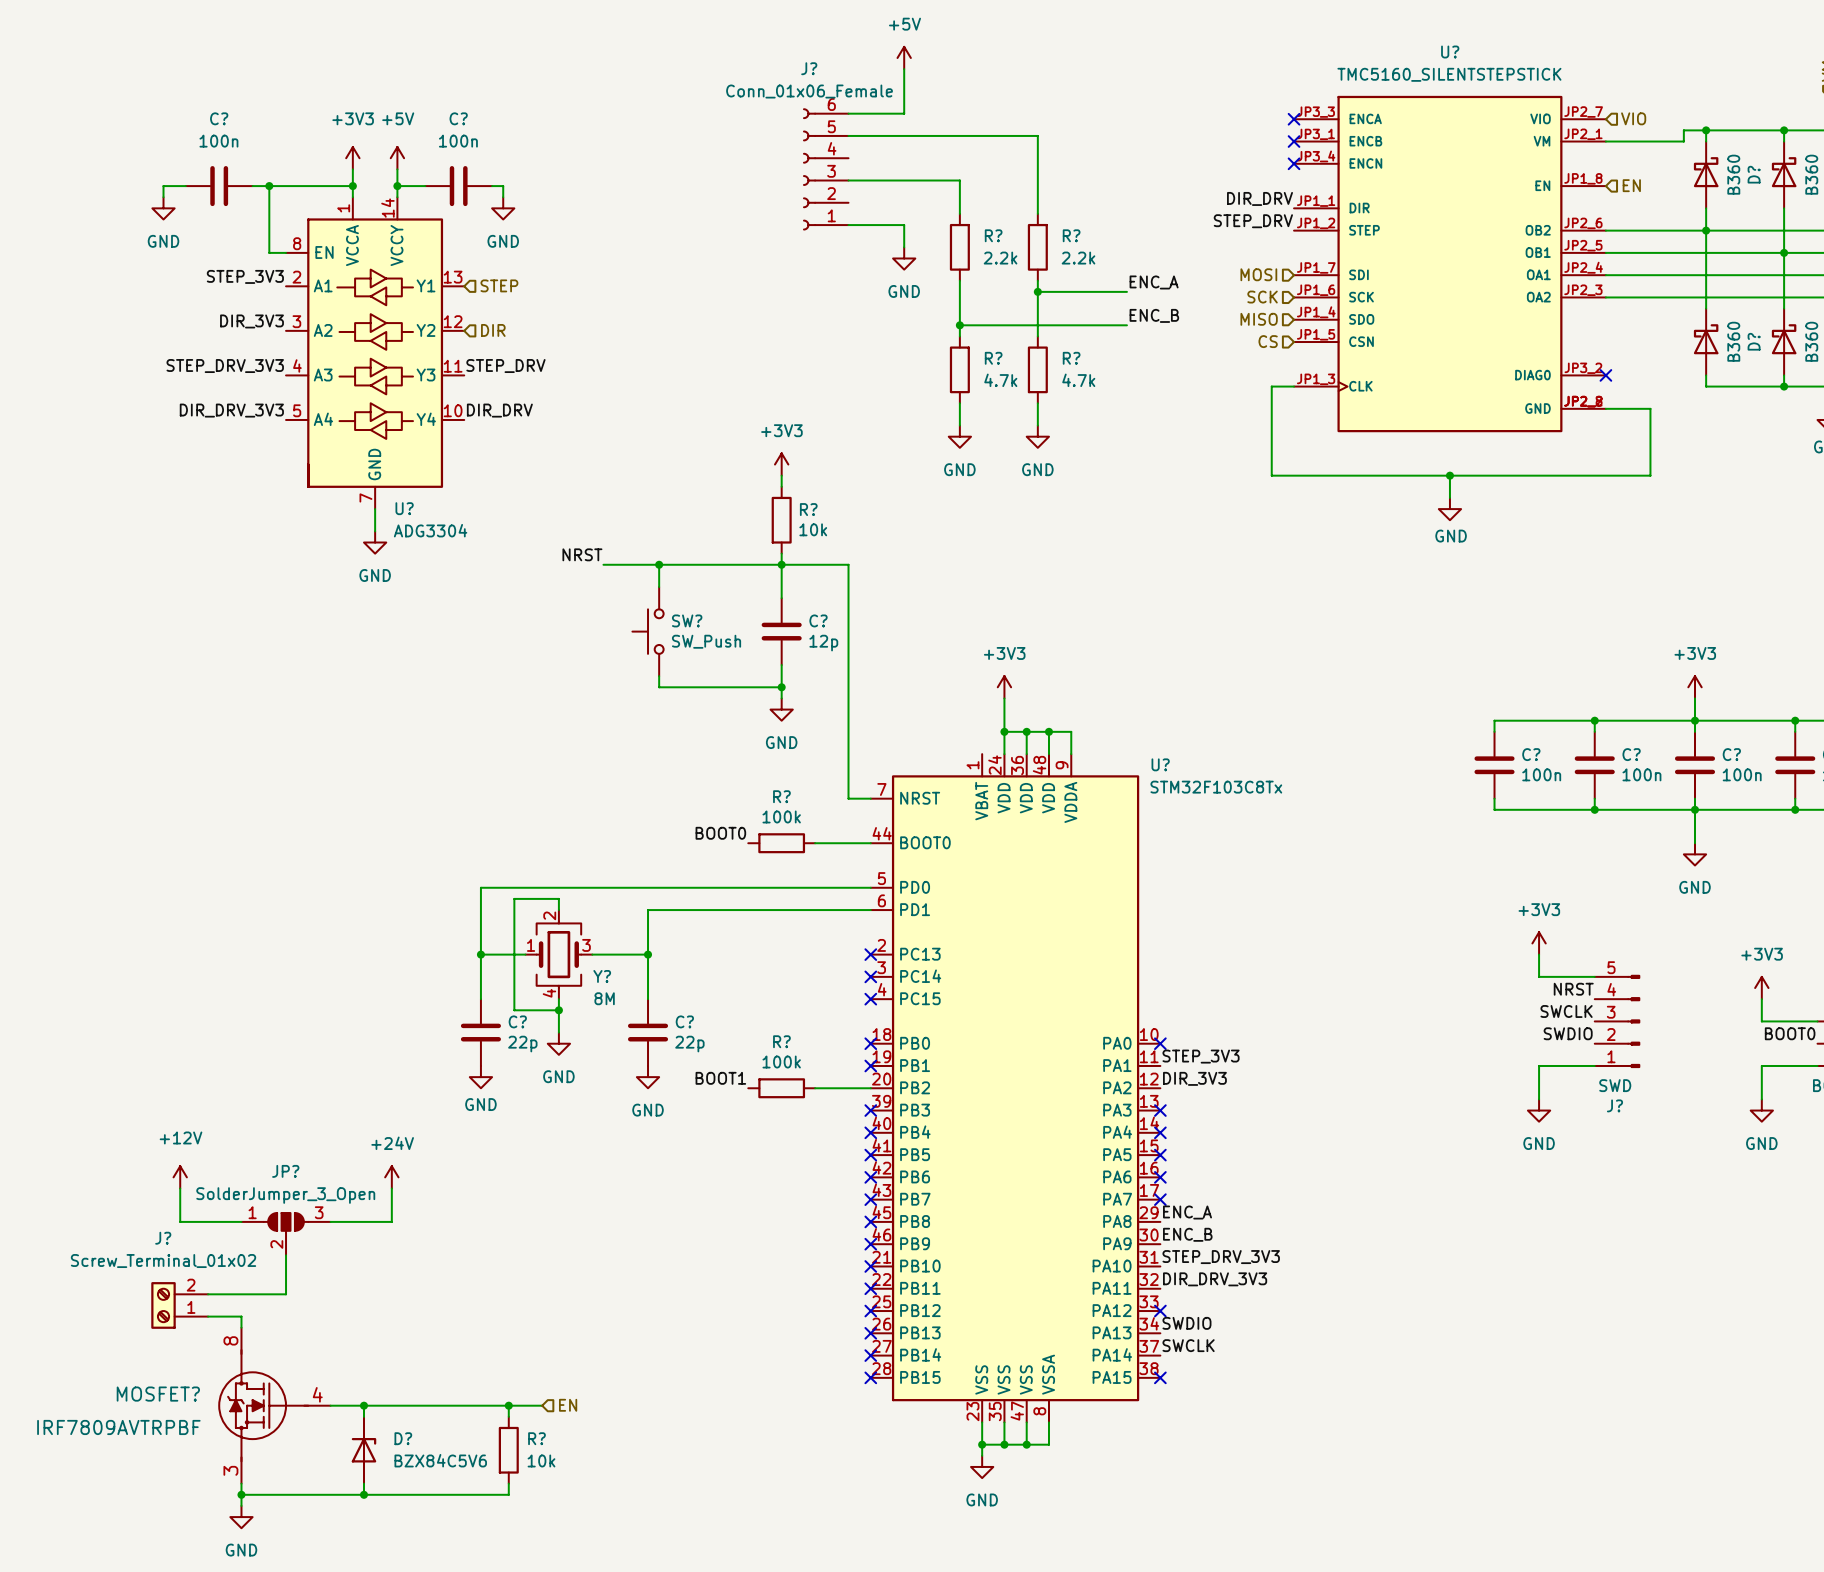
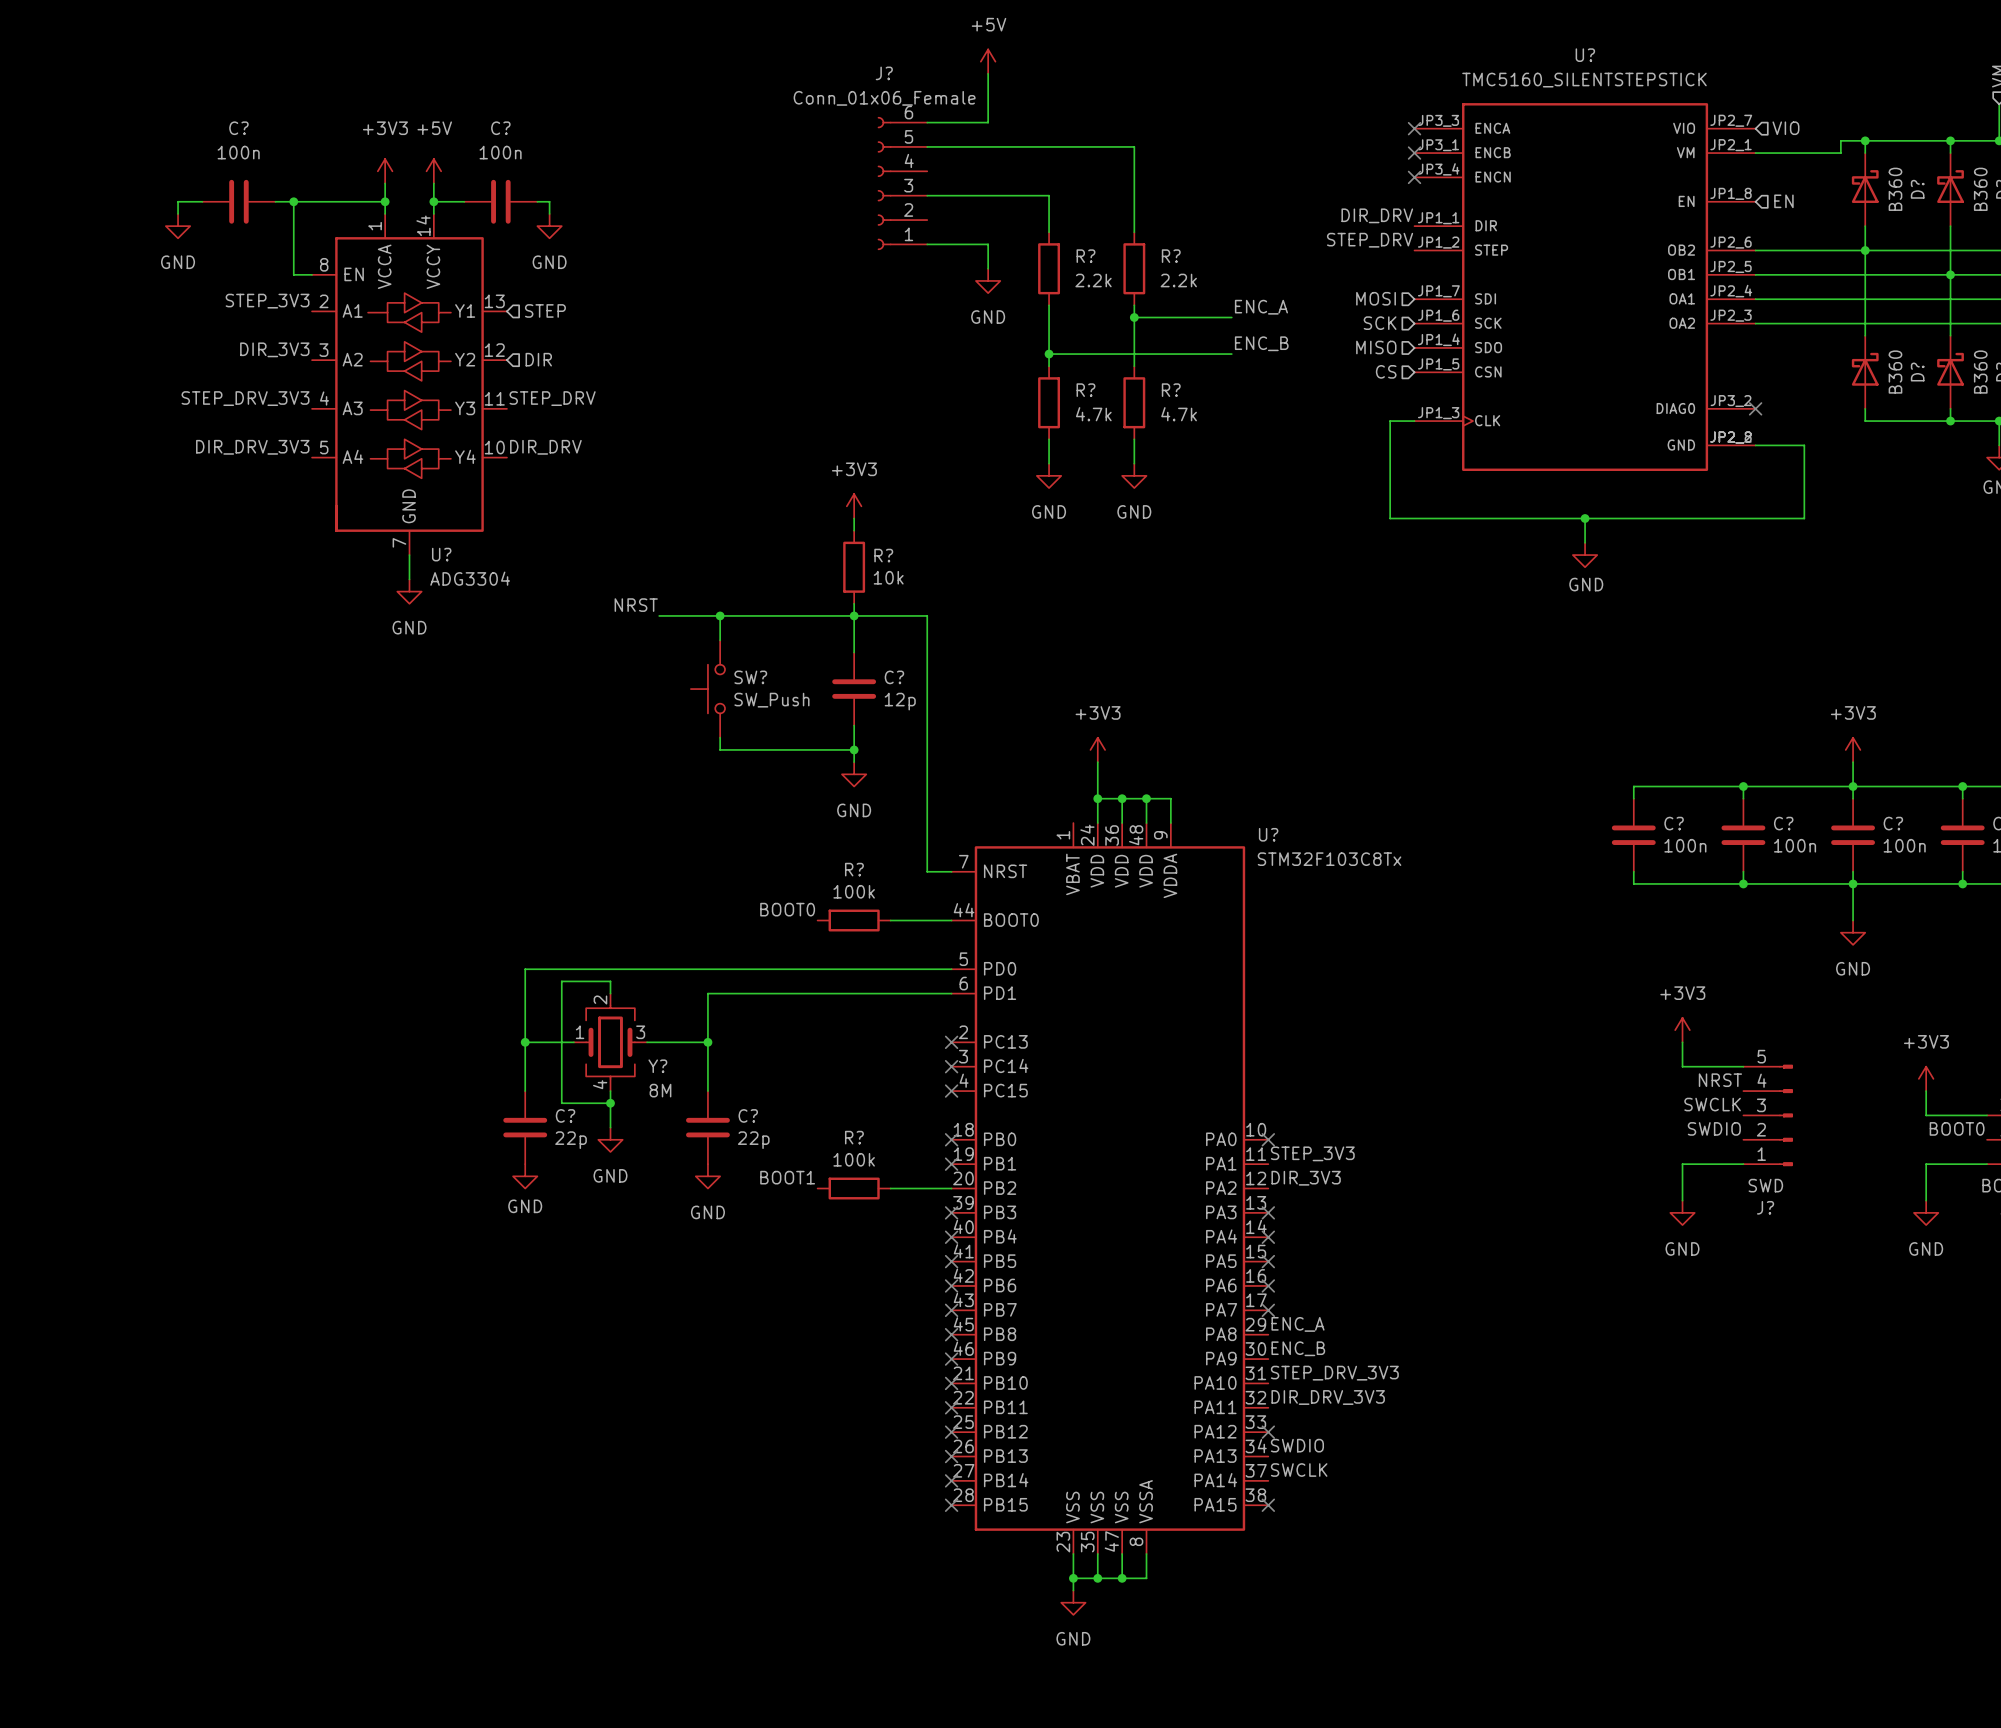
power symbol: +12V (180, 1177) -> none
power symbol: +24V (391, 1177) -> none
wire: (180, 1188) (180, 1221) (241, 1221) -> none
wire: (391, 1188) (391, 1221) (330, 1221) -> none
JP?: SolderJumper_3_Open (286, 1234) -> none
wire: (286, 1255) (286, 1294) (208, 1294) -> none
J?: Screw_Terminal_01x02 (179, 1305) -> none
wire: (208, 1316) (241, 1316) (241, 1327) -> none
MOSFET?: IRF7809AVTRPBF (274, 1405) -> none
wire: (330, 1405) (542, 1405) -> none
wire: (363, 1405) (363, 1416) -> none
junction: (363, 1405) -> none
wire: (508, 1405) (508, 1416) -> none
junction: (508, 1405) -> none
hierarchical label: EN (568, 1405) -> none
D?: BZX84C5V6 (363, 1450) -> none
R?: 10k (508, 1450) -> none
wire: (241, 1483) (241, 1505) -> none
wire: (363, 1483) (363, 1494) -> none
wire: (508, 1483) (508, 1494) (241, 1494) -> none
junction: (241, 1494) -> none
junction: (363, 1494) -> none
power symbol: GND (241, 1517) -> none

